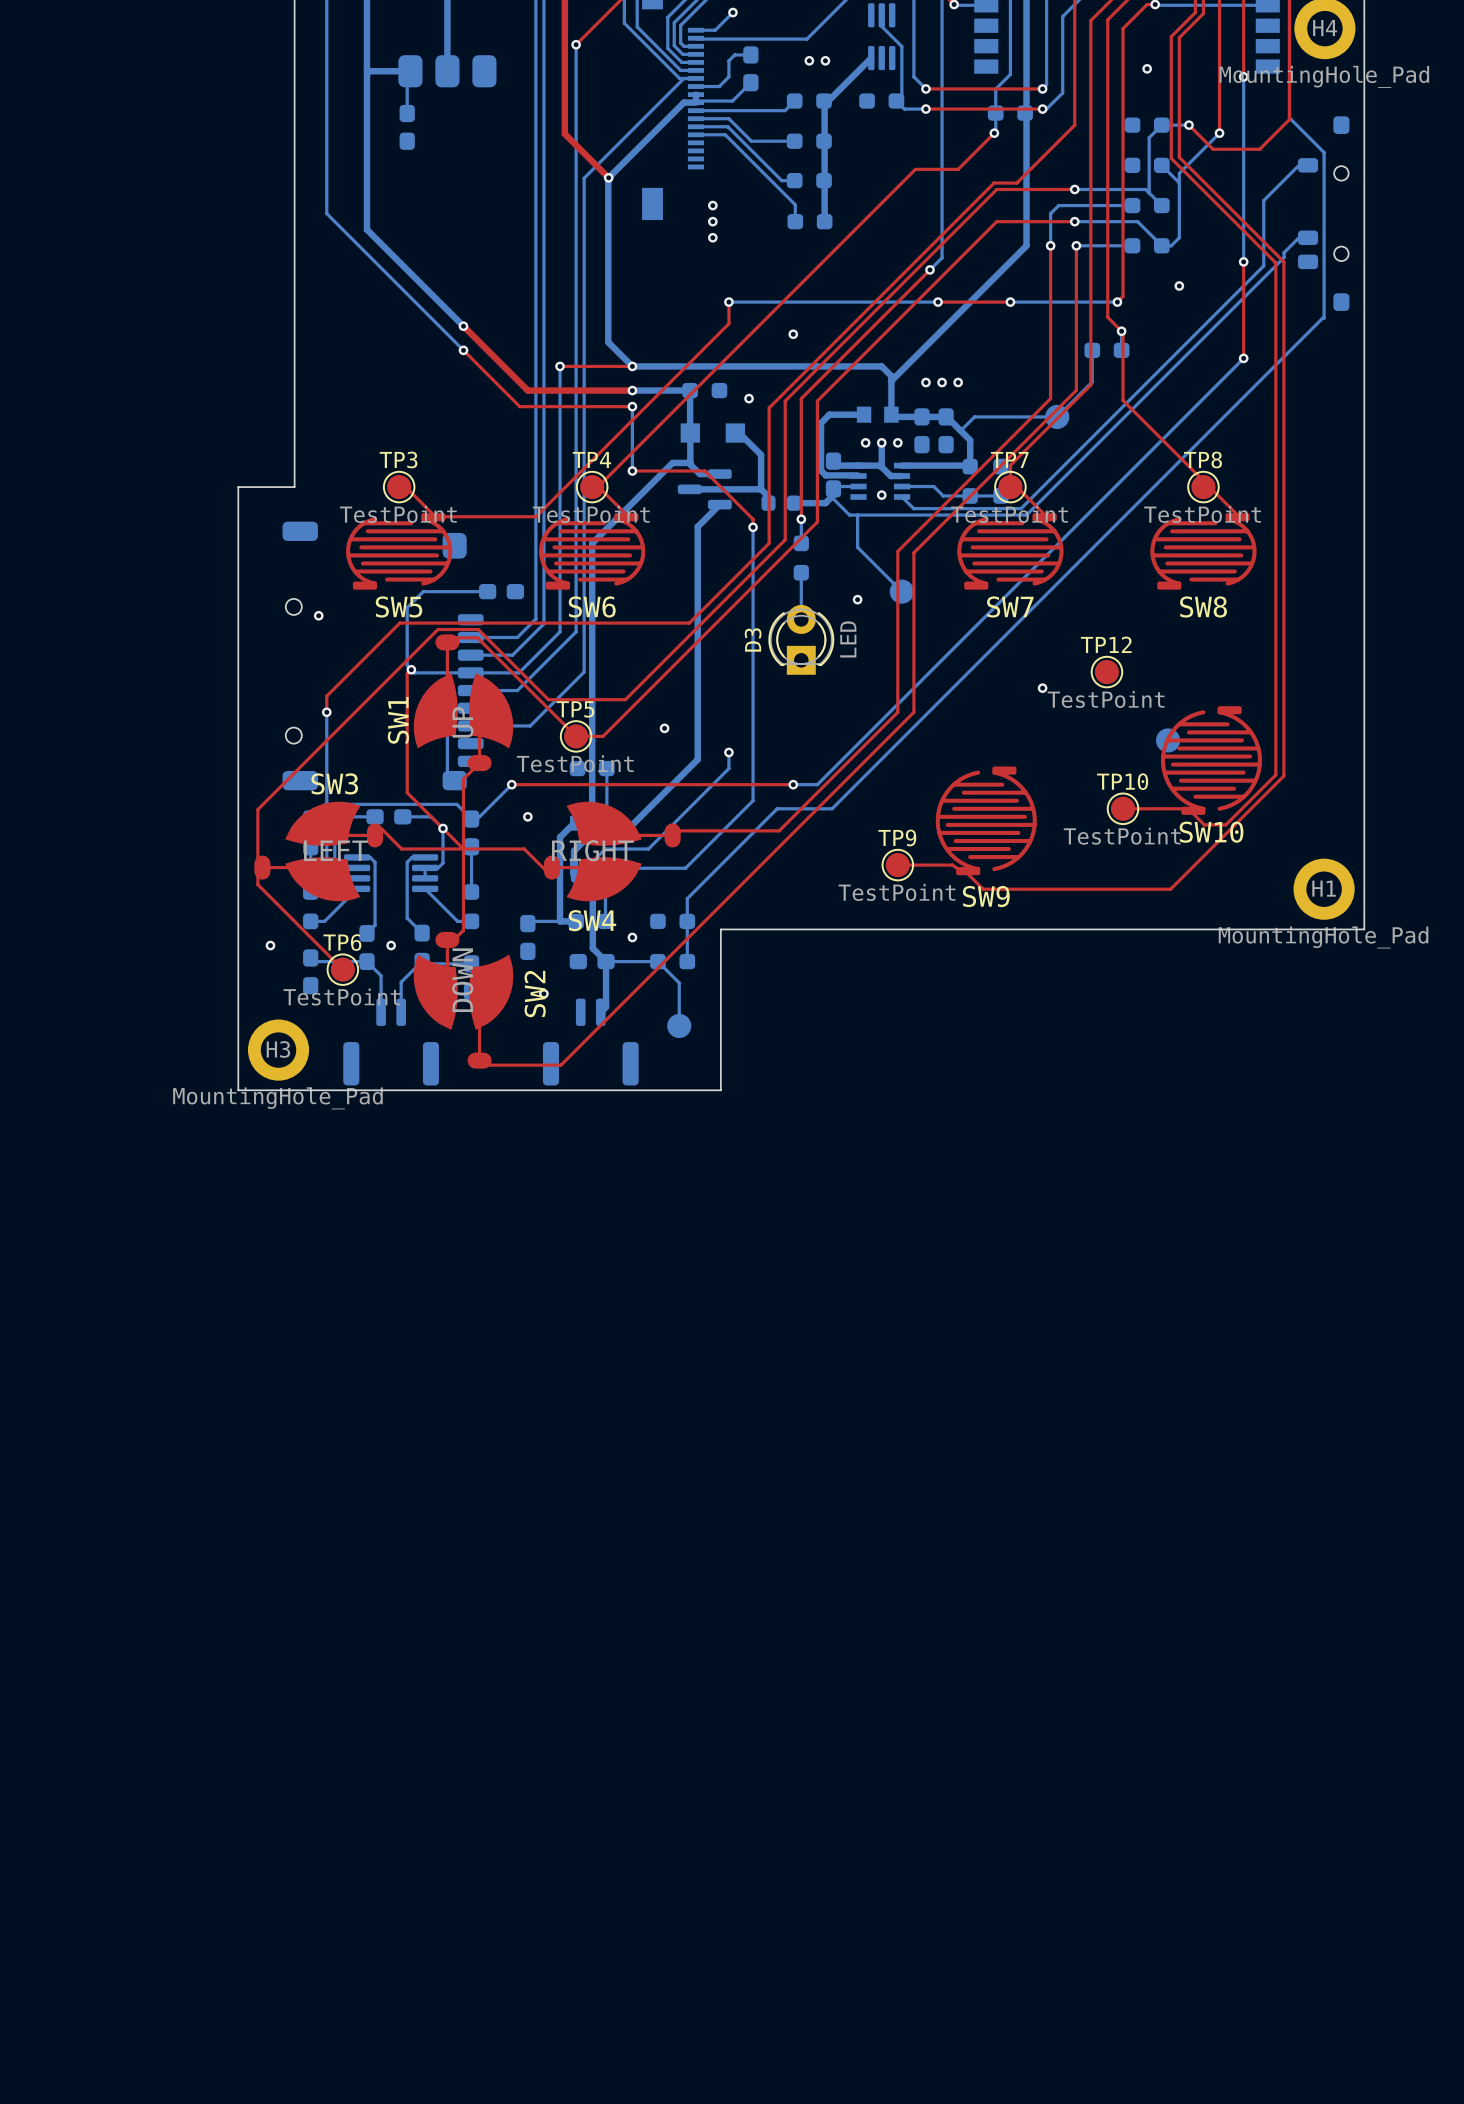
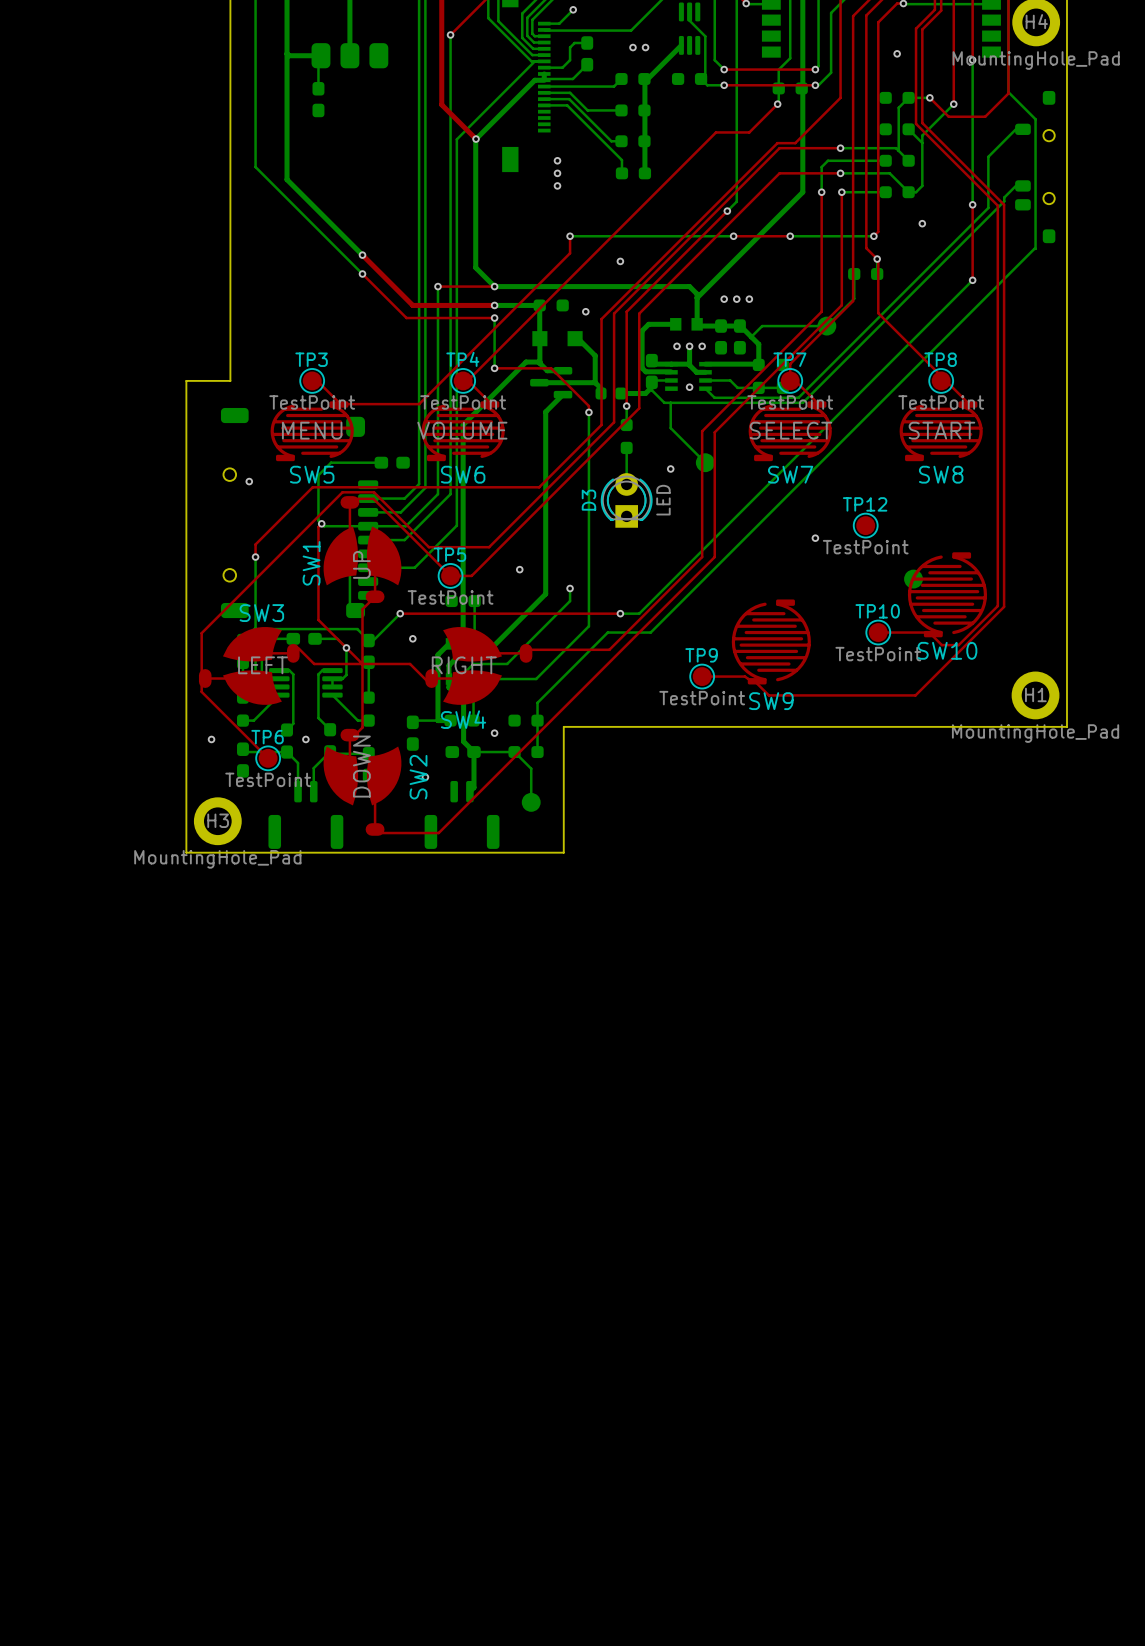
SW5 value: none -> MENU (312, 430)
SW6 value: none -> VOLUME (462, 430)
SW7 value: none -> SELECT (790, 430)
SW8 value: none -> START (941, 430)

